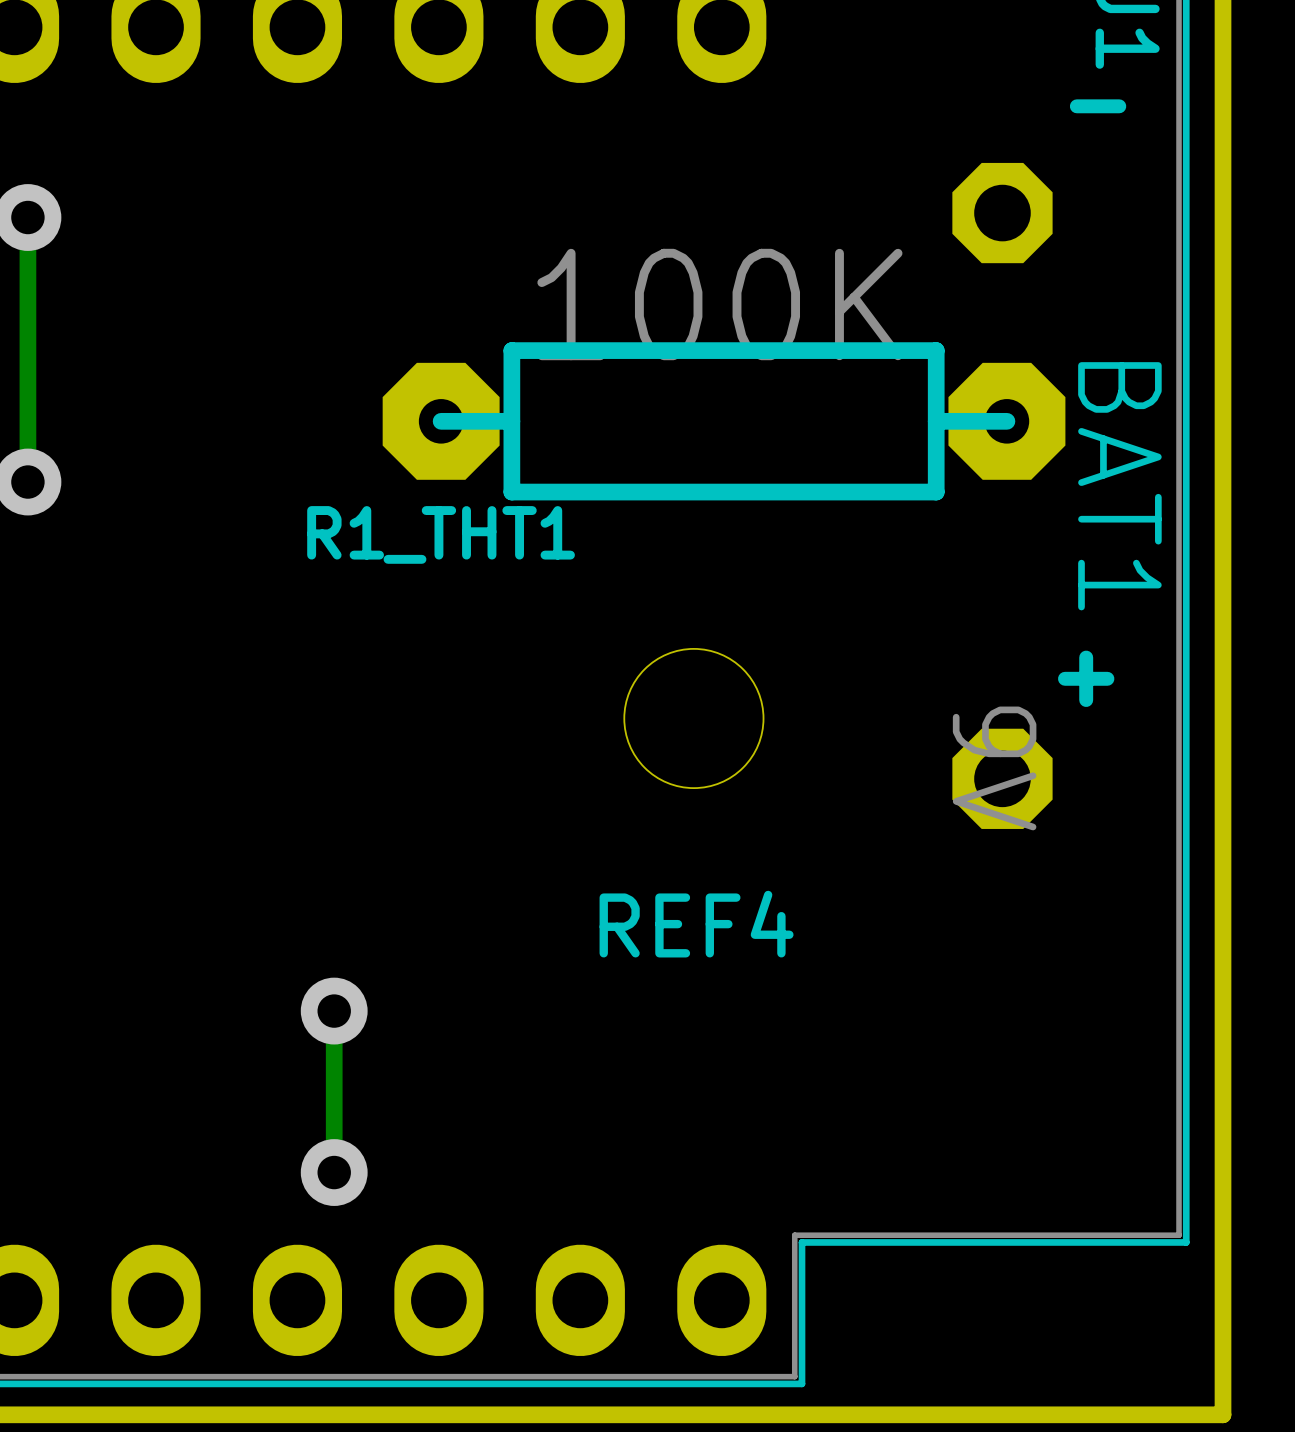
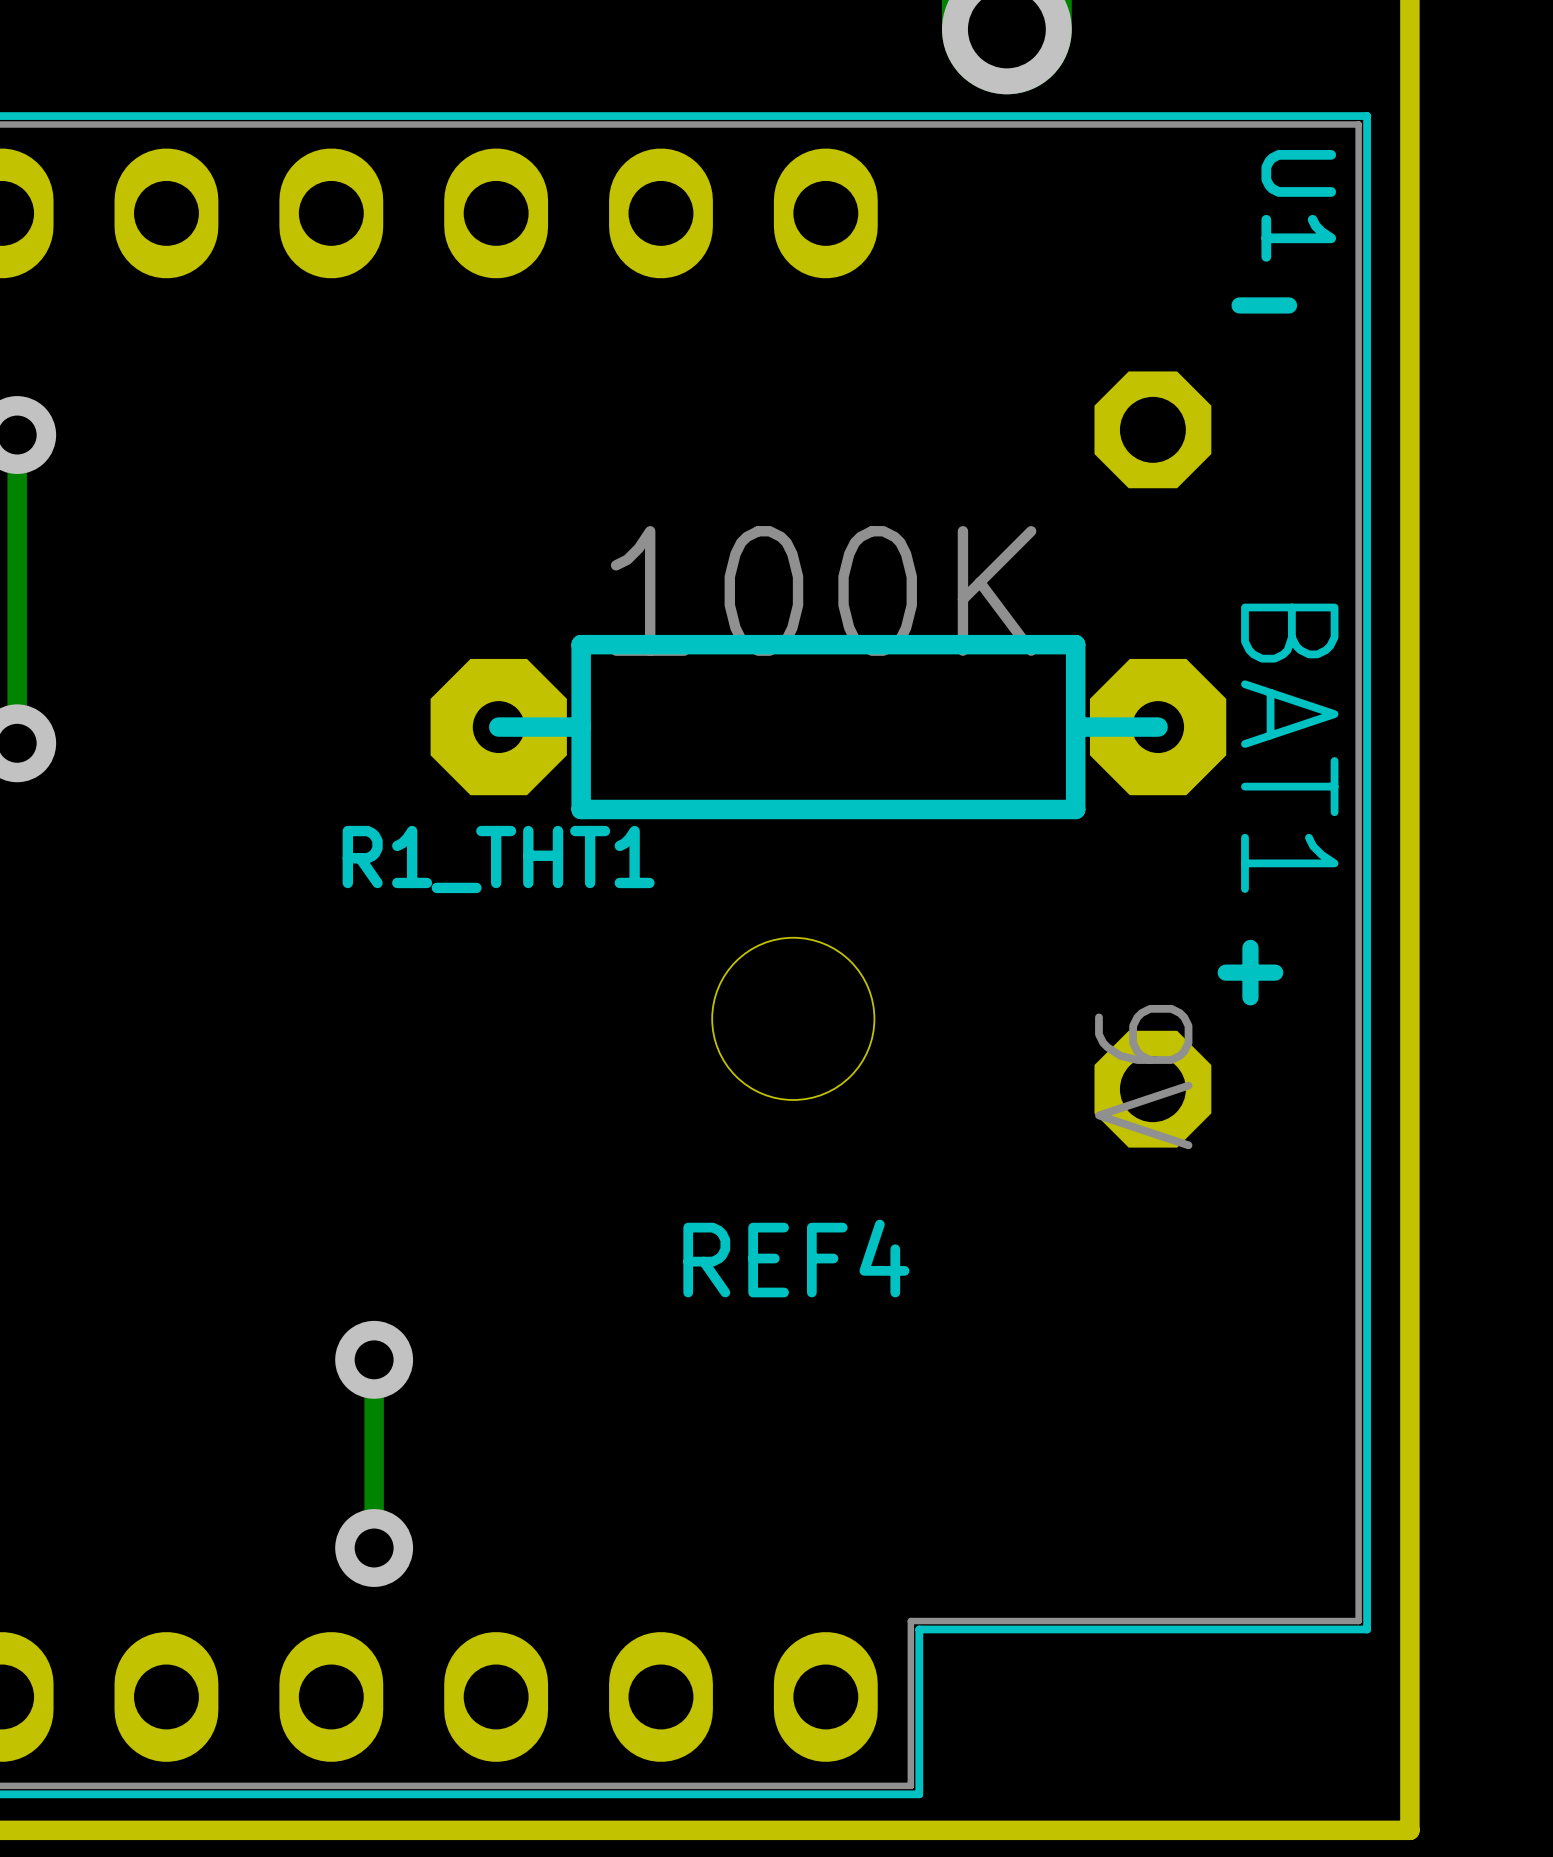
R1_THT1 position: (724, 421) -> (828, 727)

